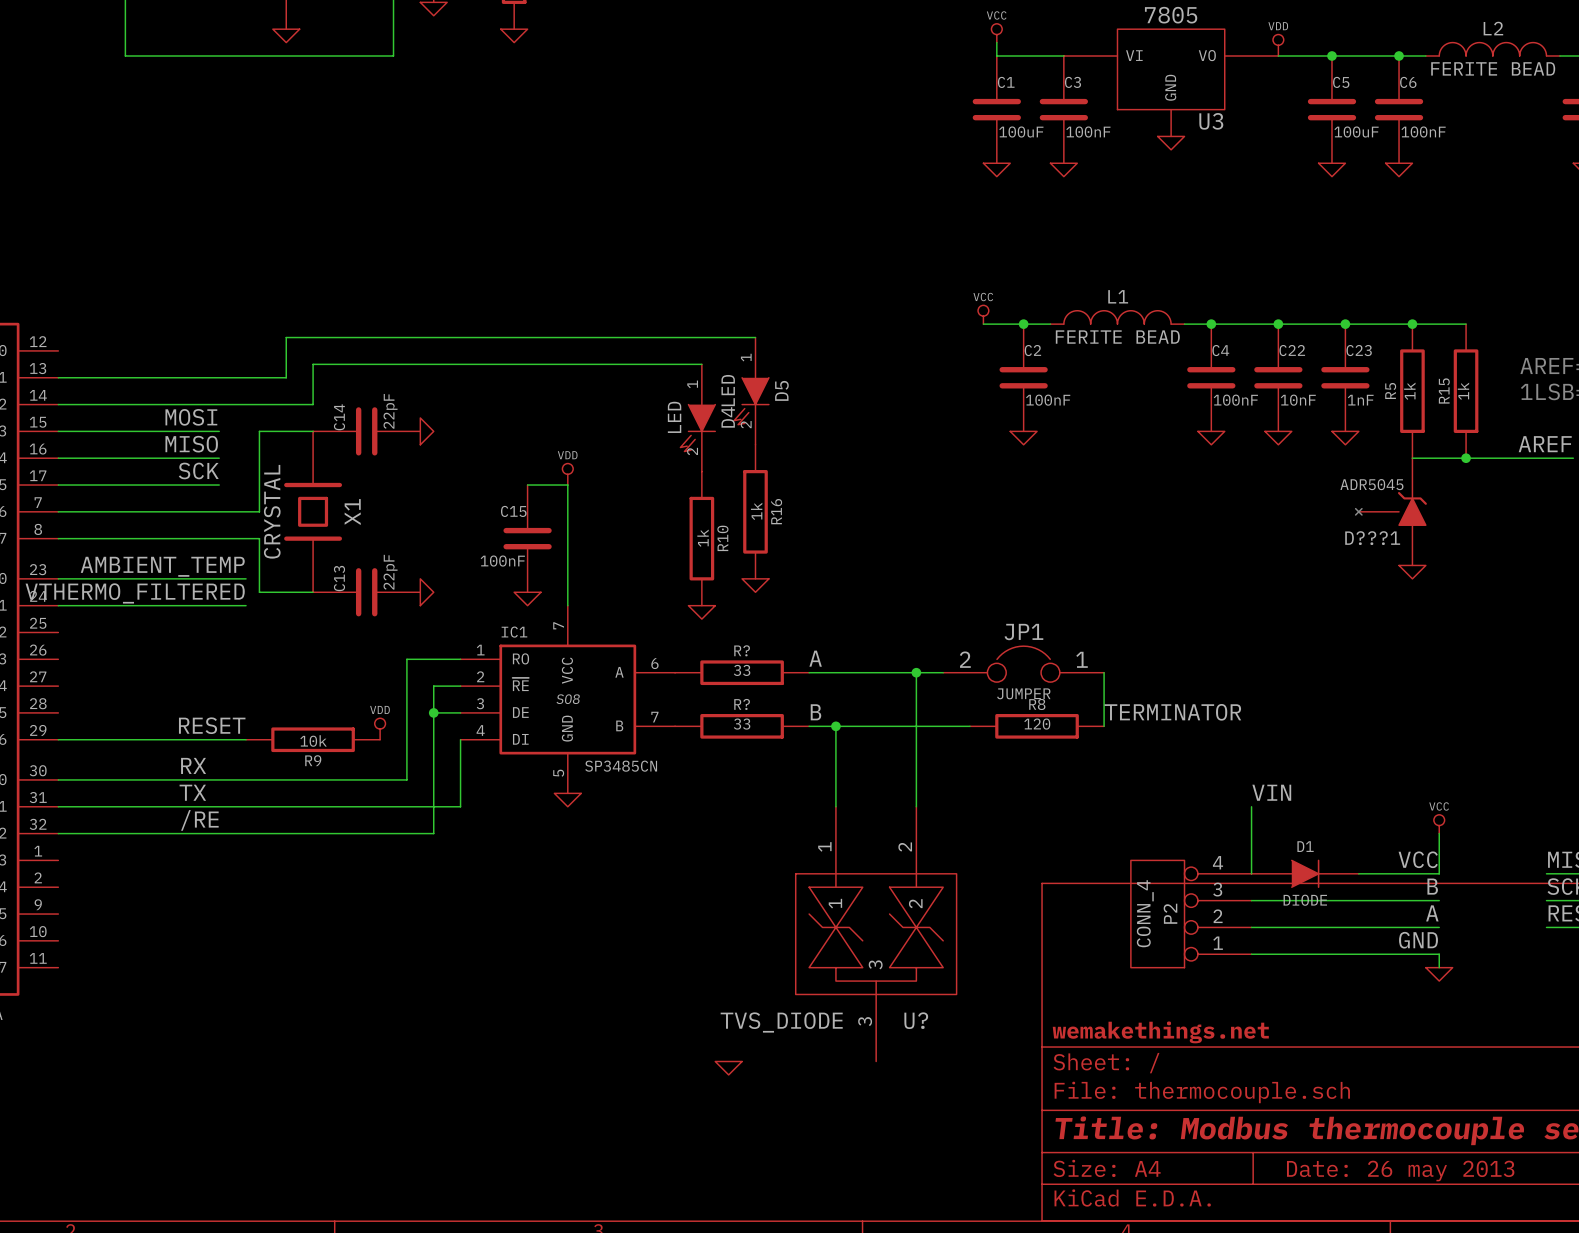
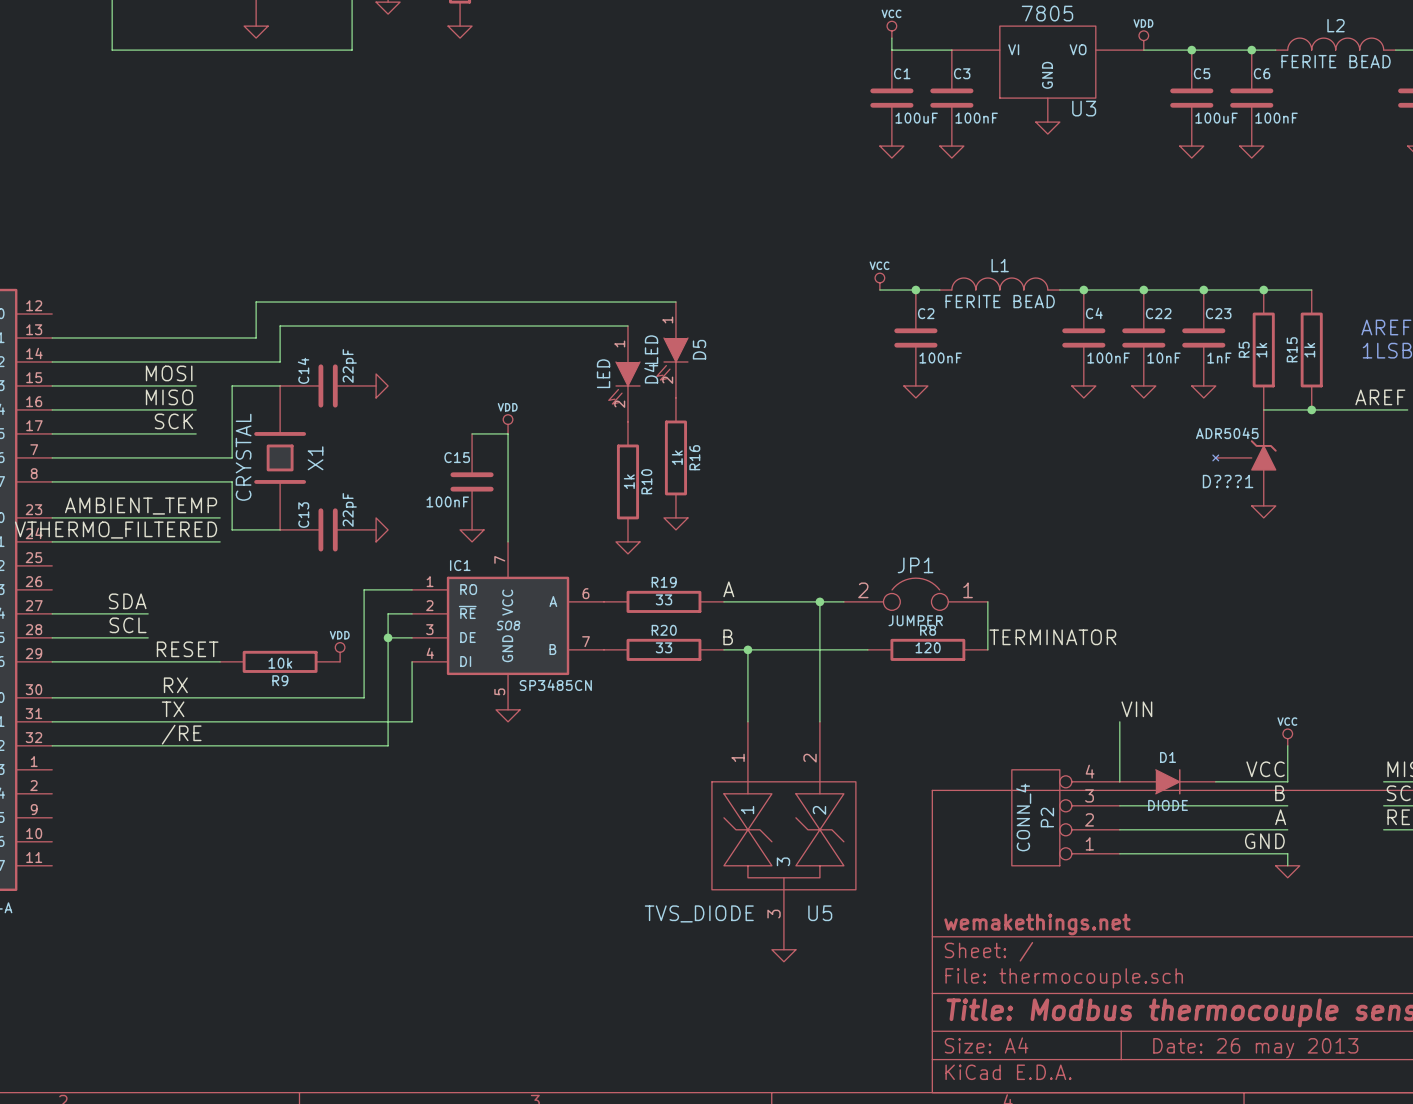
R? name: R? (742, 650) -> R19 (664, 582)
label: none -> SDA (127, 601)
wire: none -> (52, 613) (148, 613)
label: none -> SCL (128, 625)
R? name: R? (742, 704) -> R20 (664, 630)
wire: none -> (52, 637) (148, 637)
U? name: U? (916, 1020) -> U5 (820, 913)
power symbol position: (728, 1068) -> (783, 955)

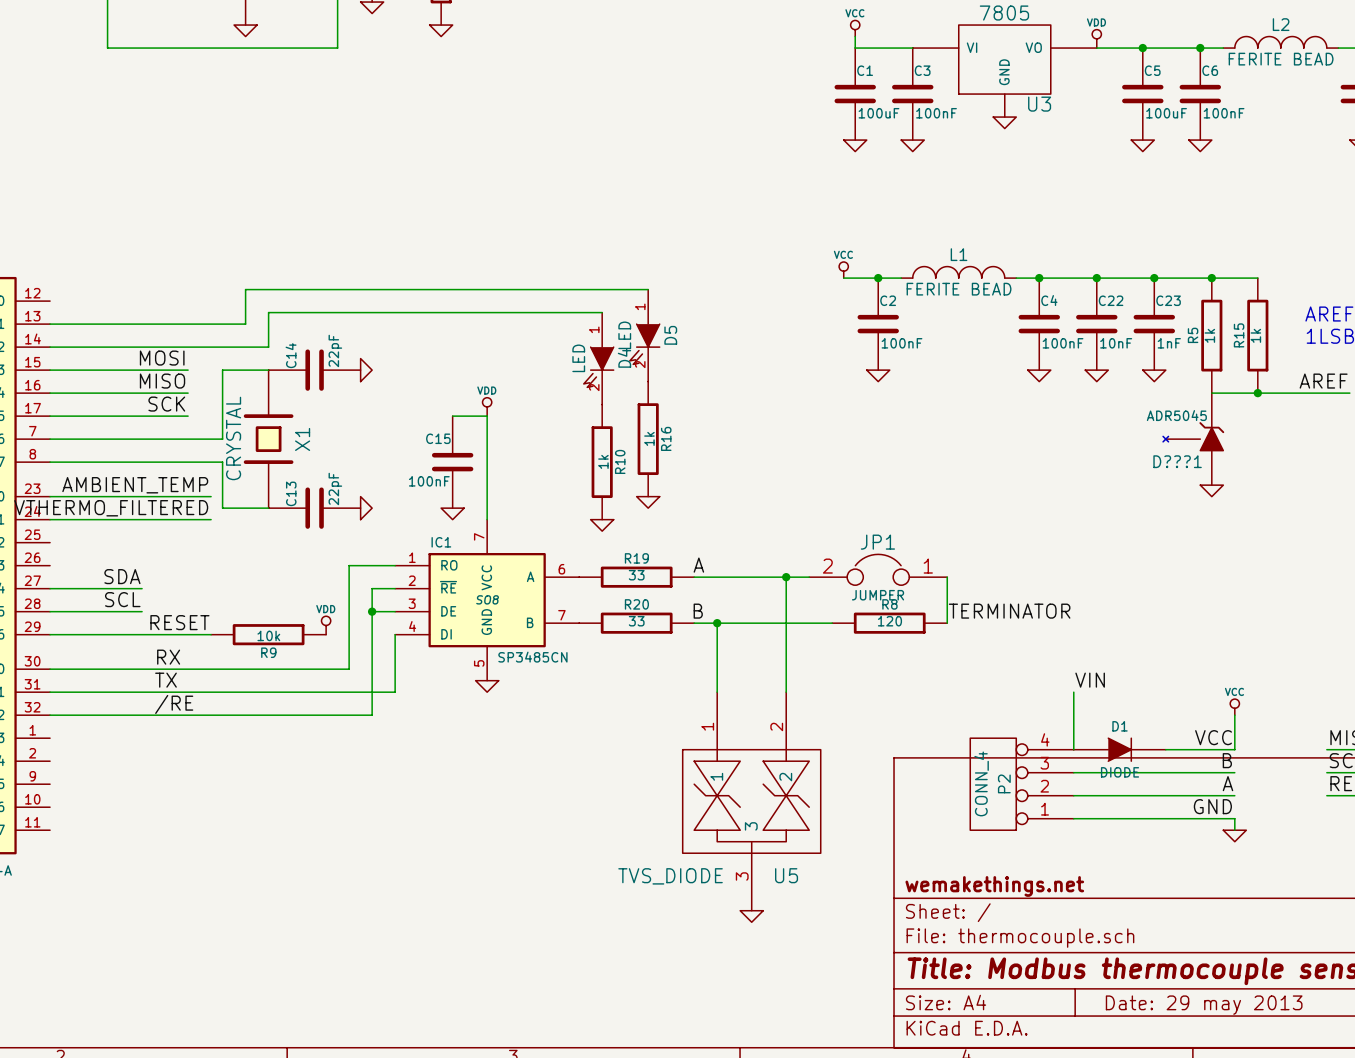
title block: Date: 26 may 2013 (1255, 1048) -> Date: 29 may 2013 (1204, 1005)

